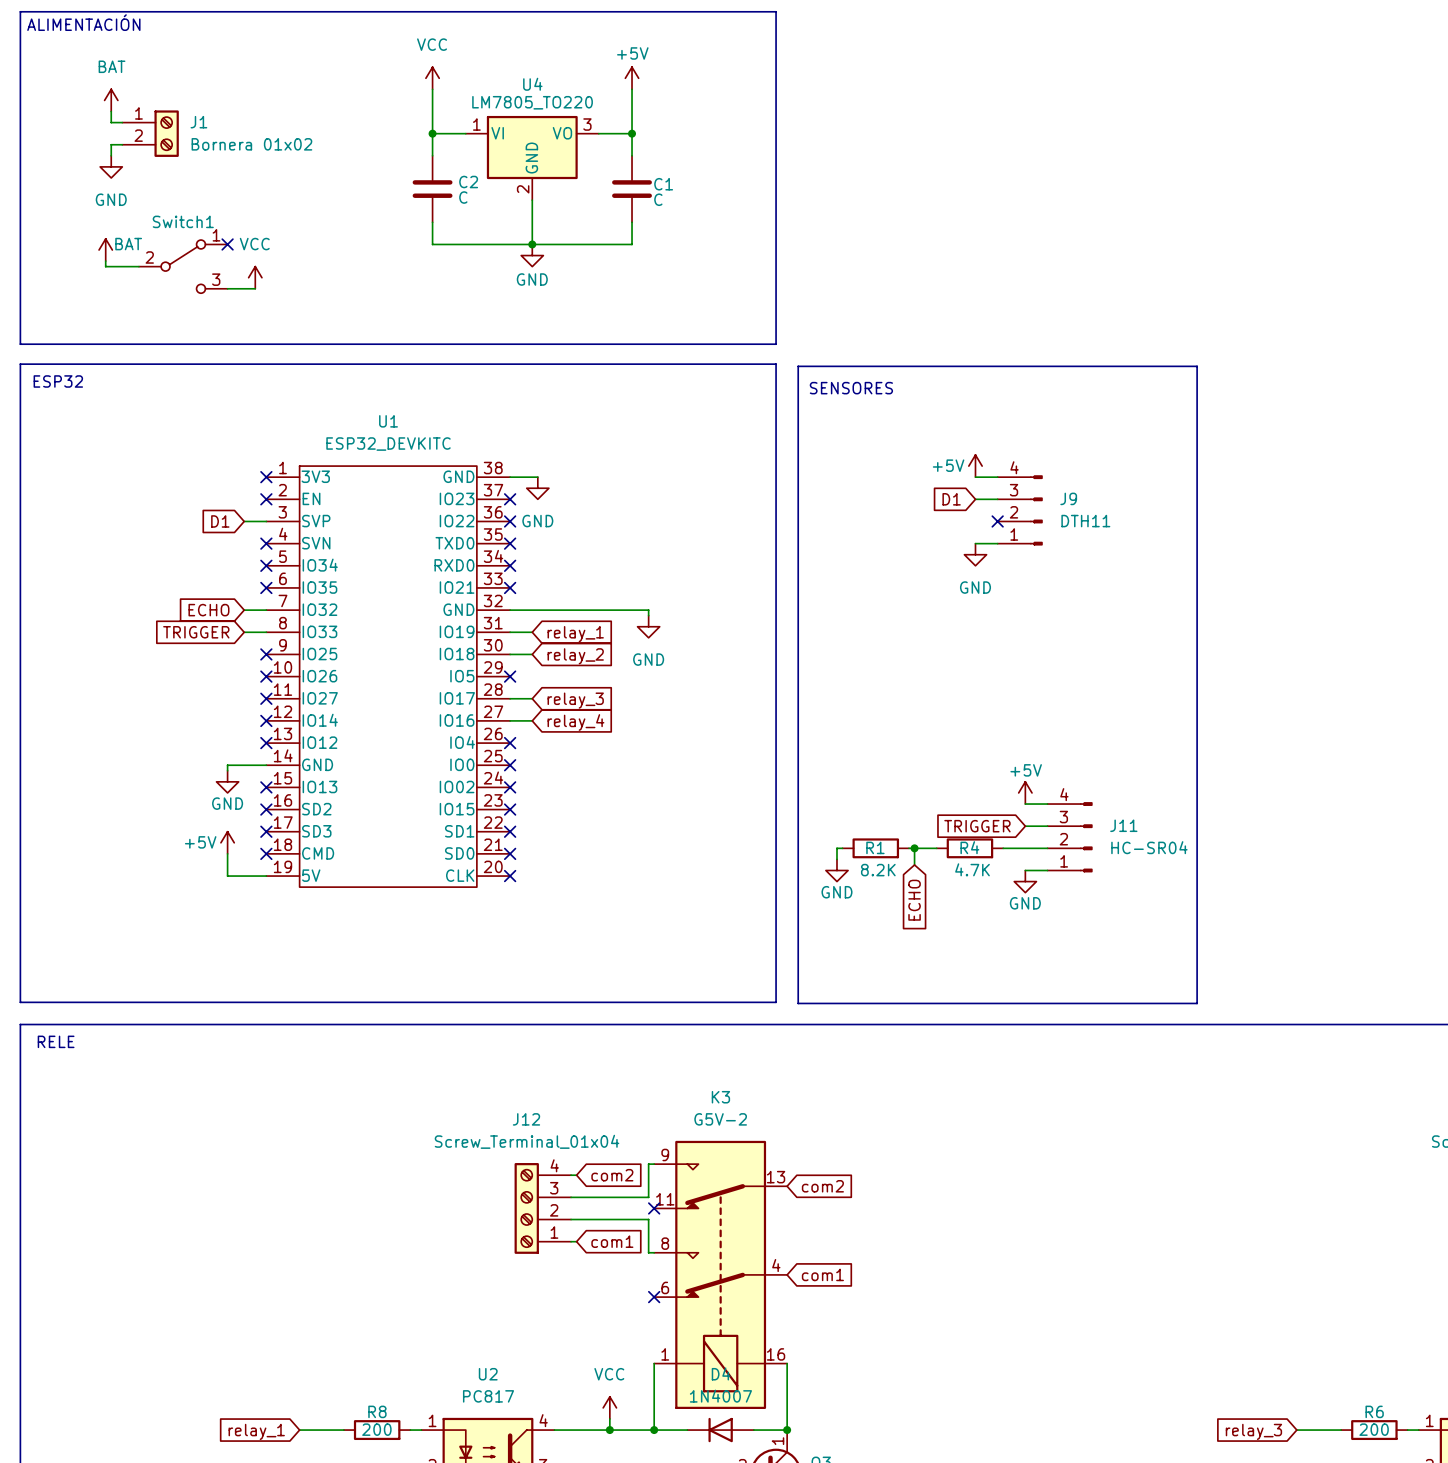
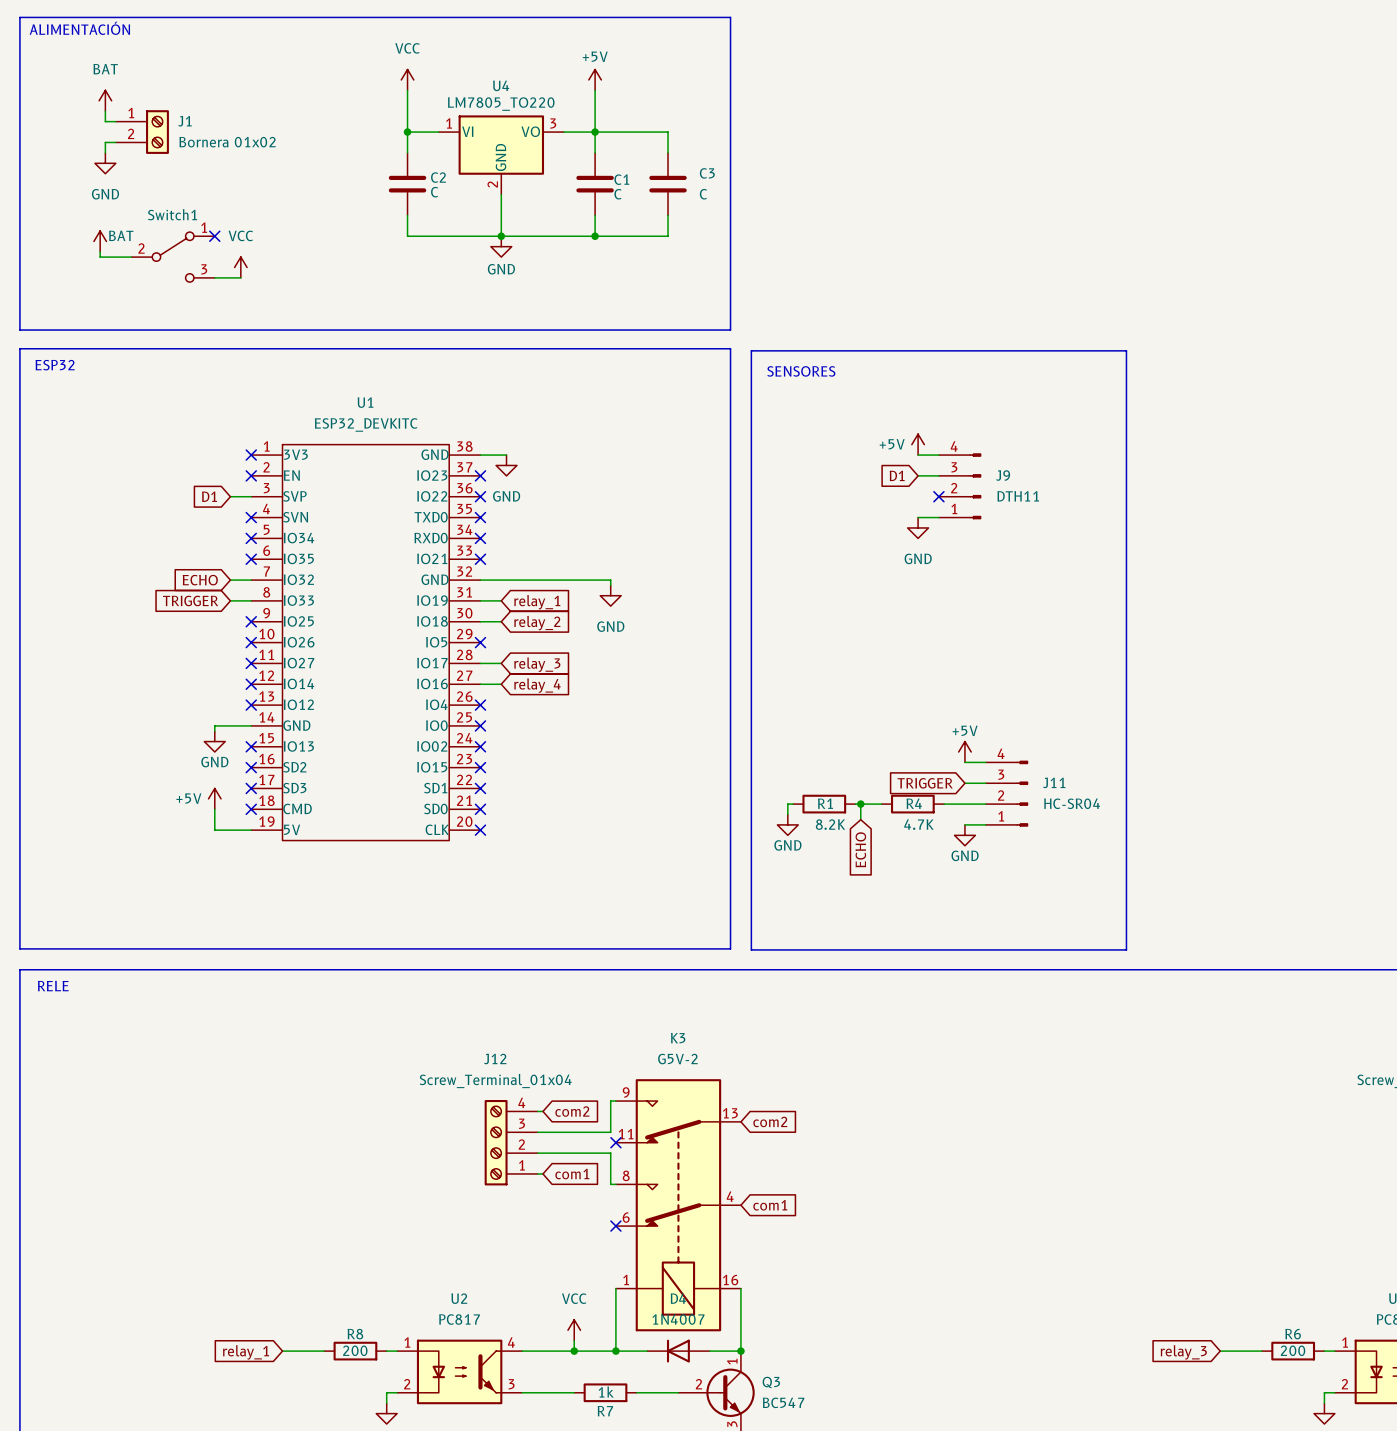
wire: none -> (595, 132) (668, 132) (668, 152)
C3: none -> C (668, 184)
wire: none -> (668, 215) (668, 236) (595, 236)
junction: none -> (595, 236)

